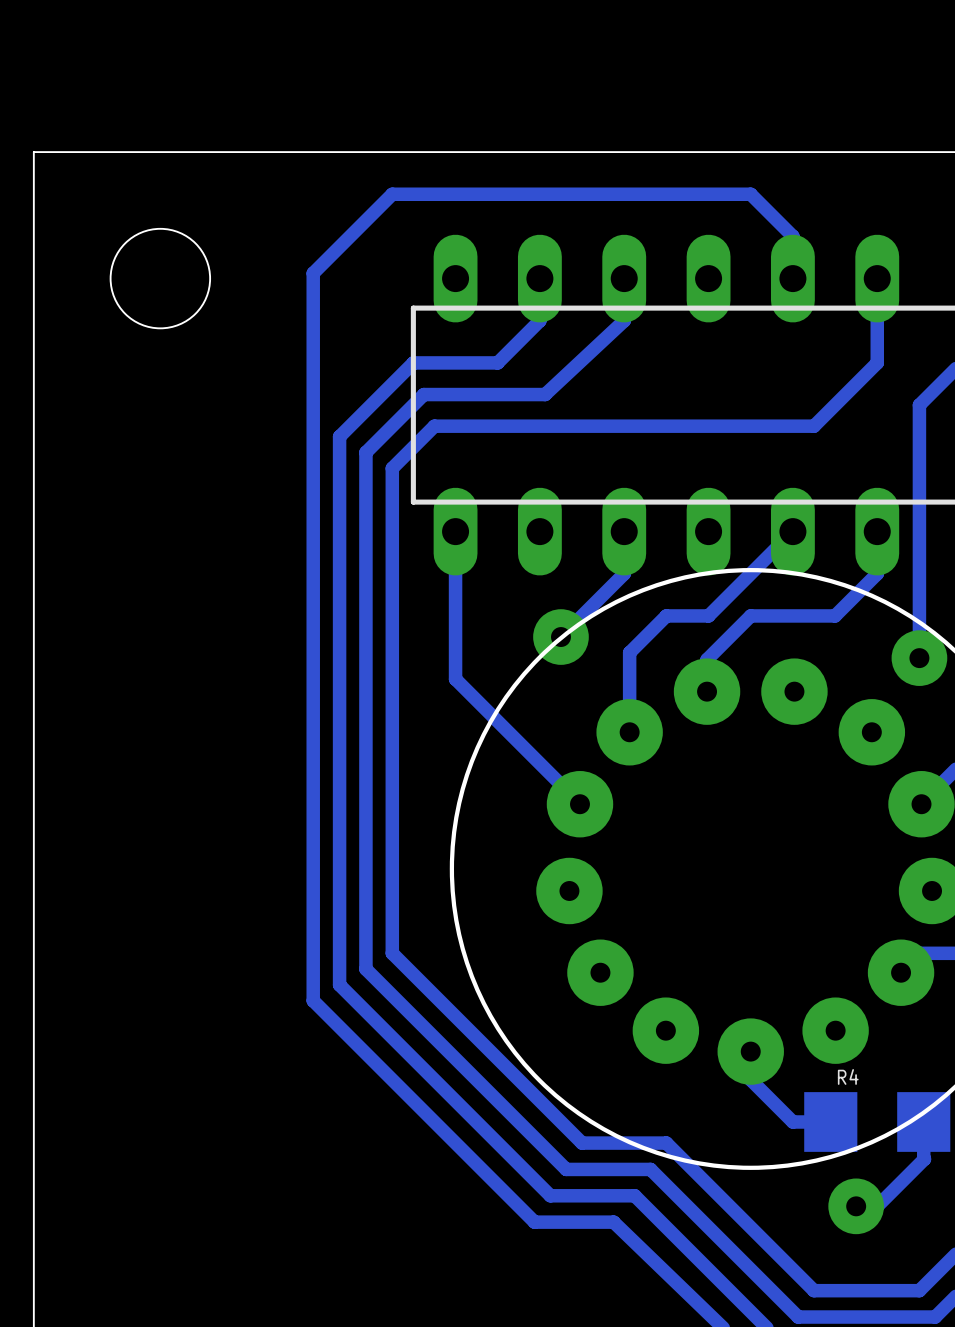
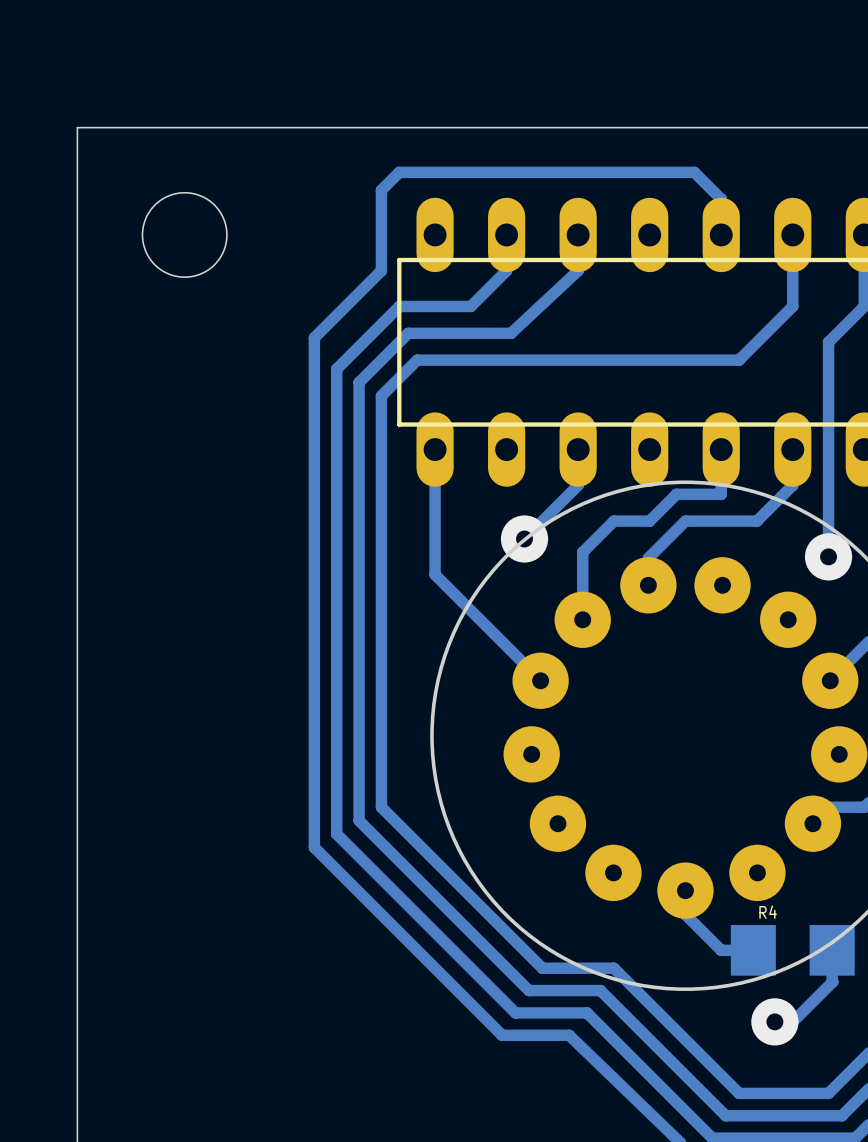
track: (761, 204) (750, 194) (392, 194) (313, 273) (313, 399) -> (694, 172) (399, 172) (381, 190) (381, 270) (314, 337)
track: (792, 531) (740, 584) -> (721, 449) (721, 494) (676, 494)

